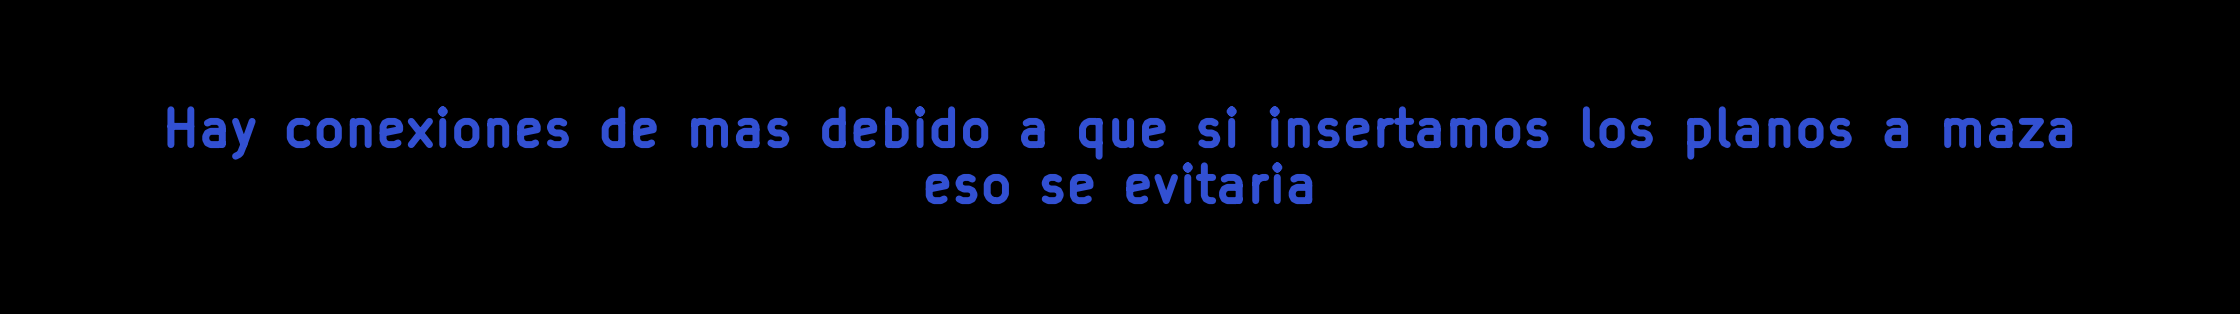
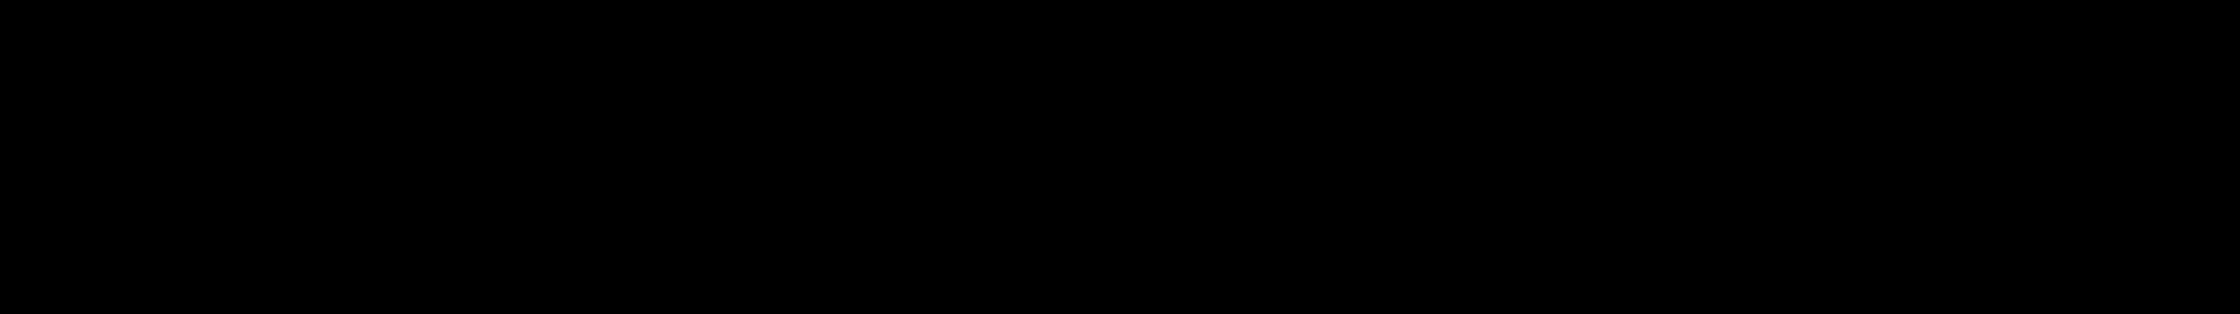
text: Hay conexiones de mas debido a que si insertamos los planos a maza (1119, 132) -> none
text: eso se evitaria (1118, 183) -> none

